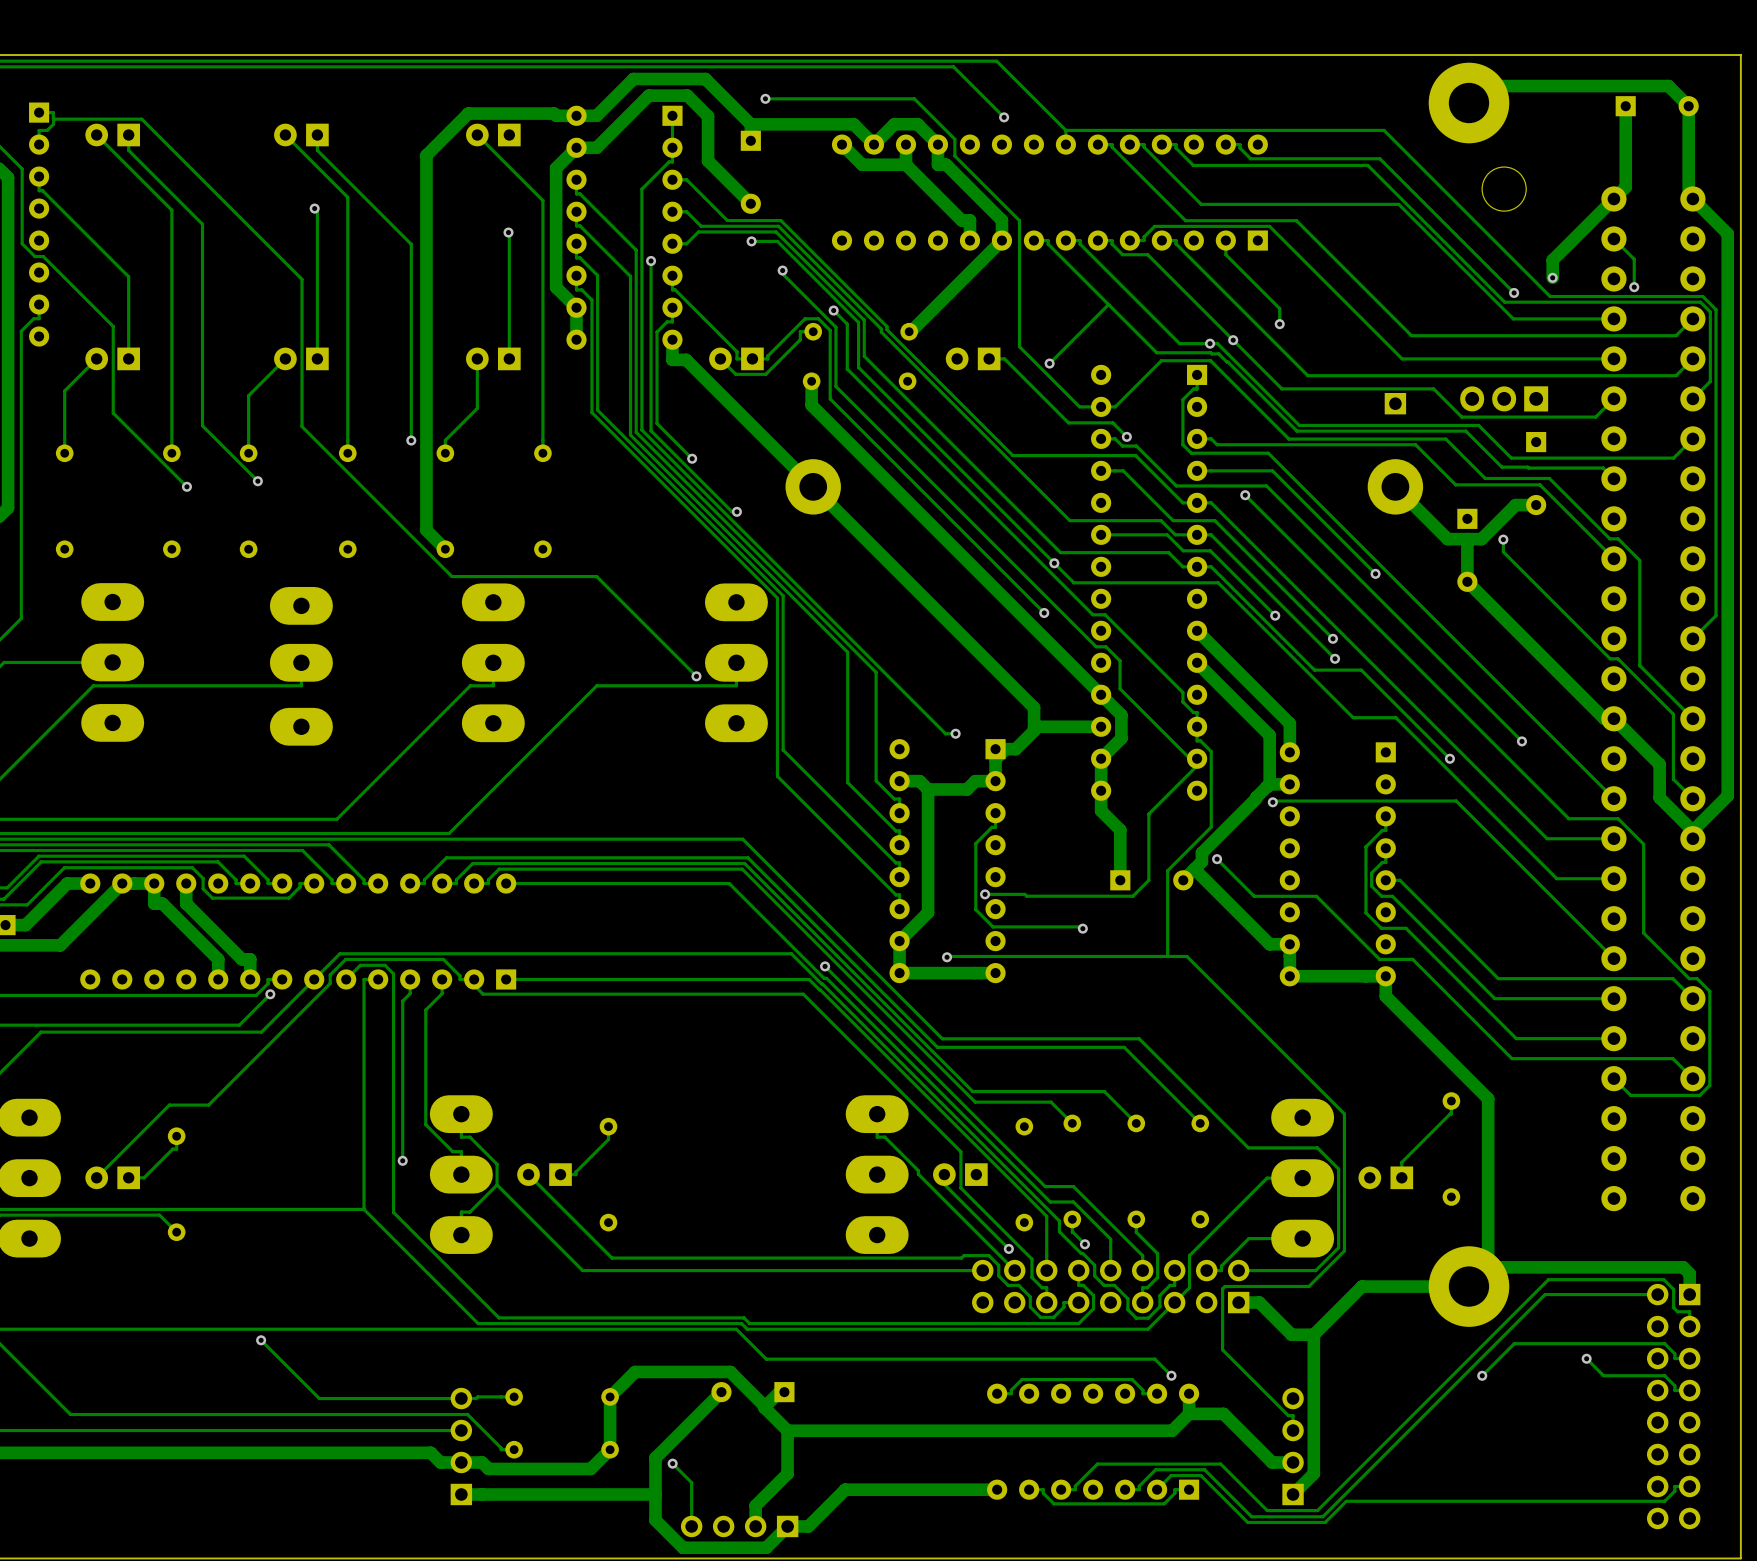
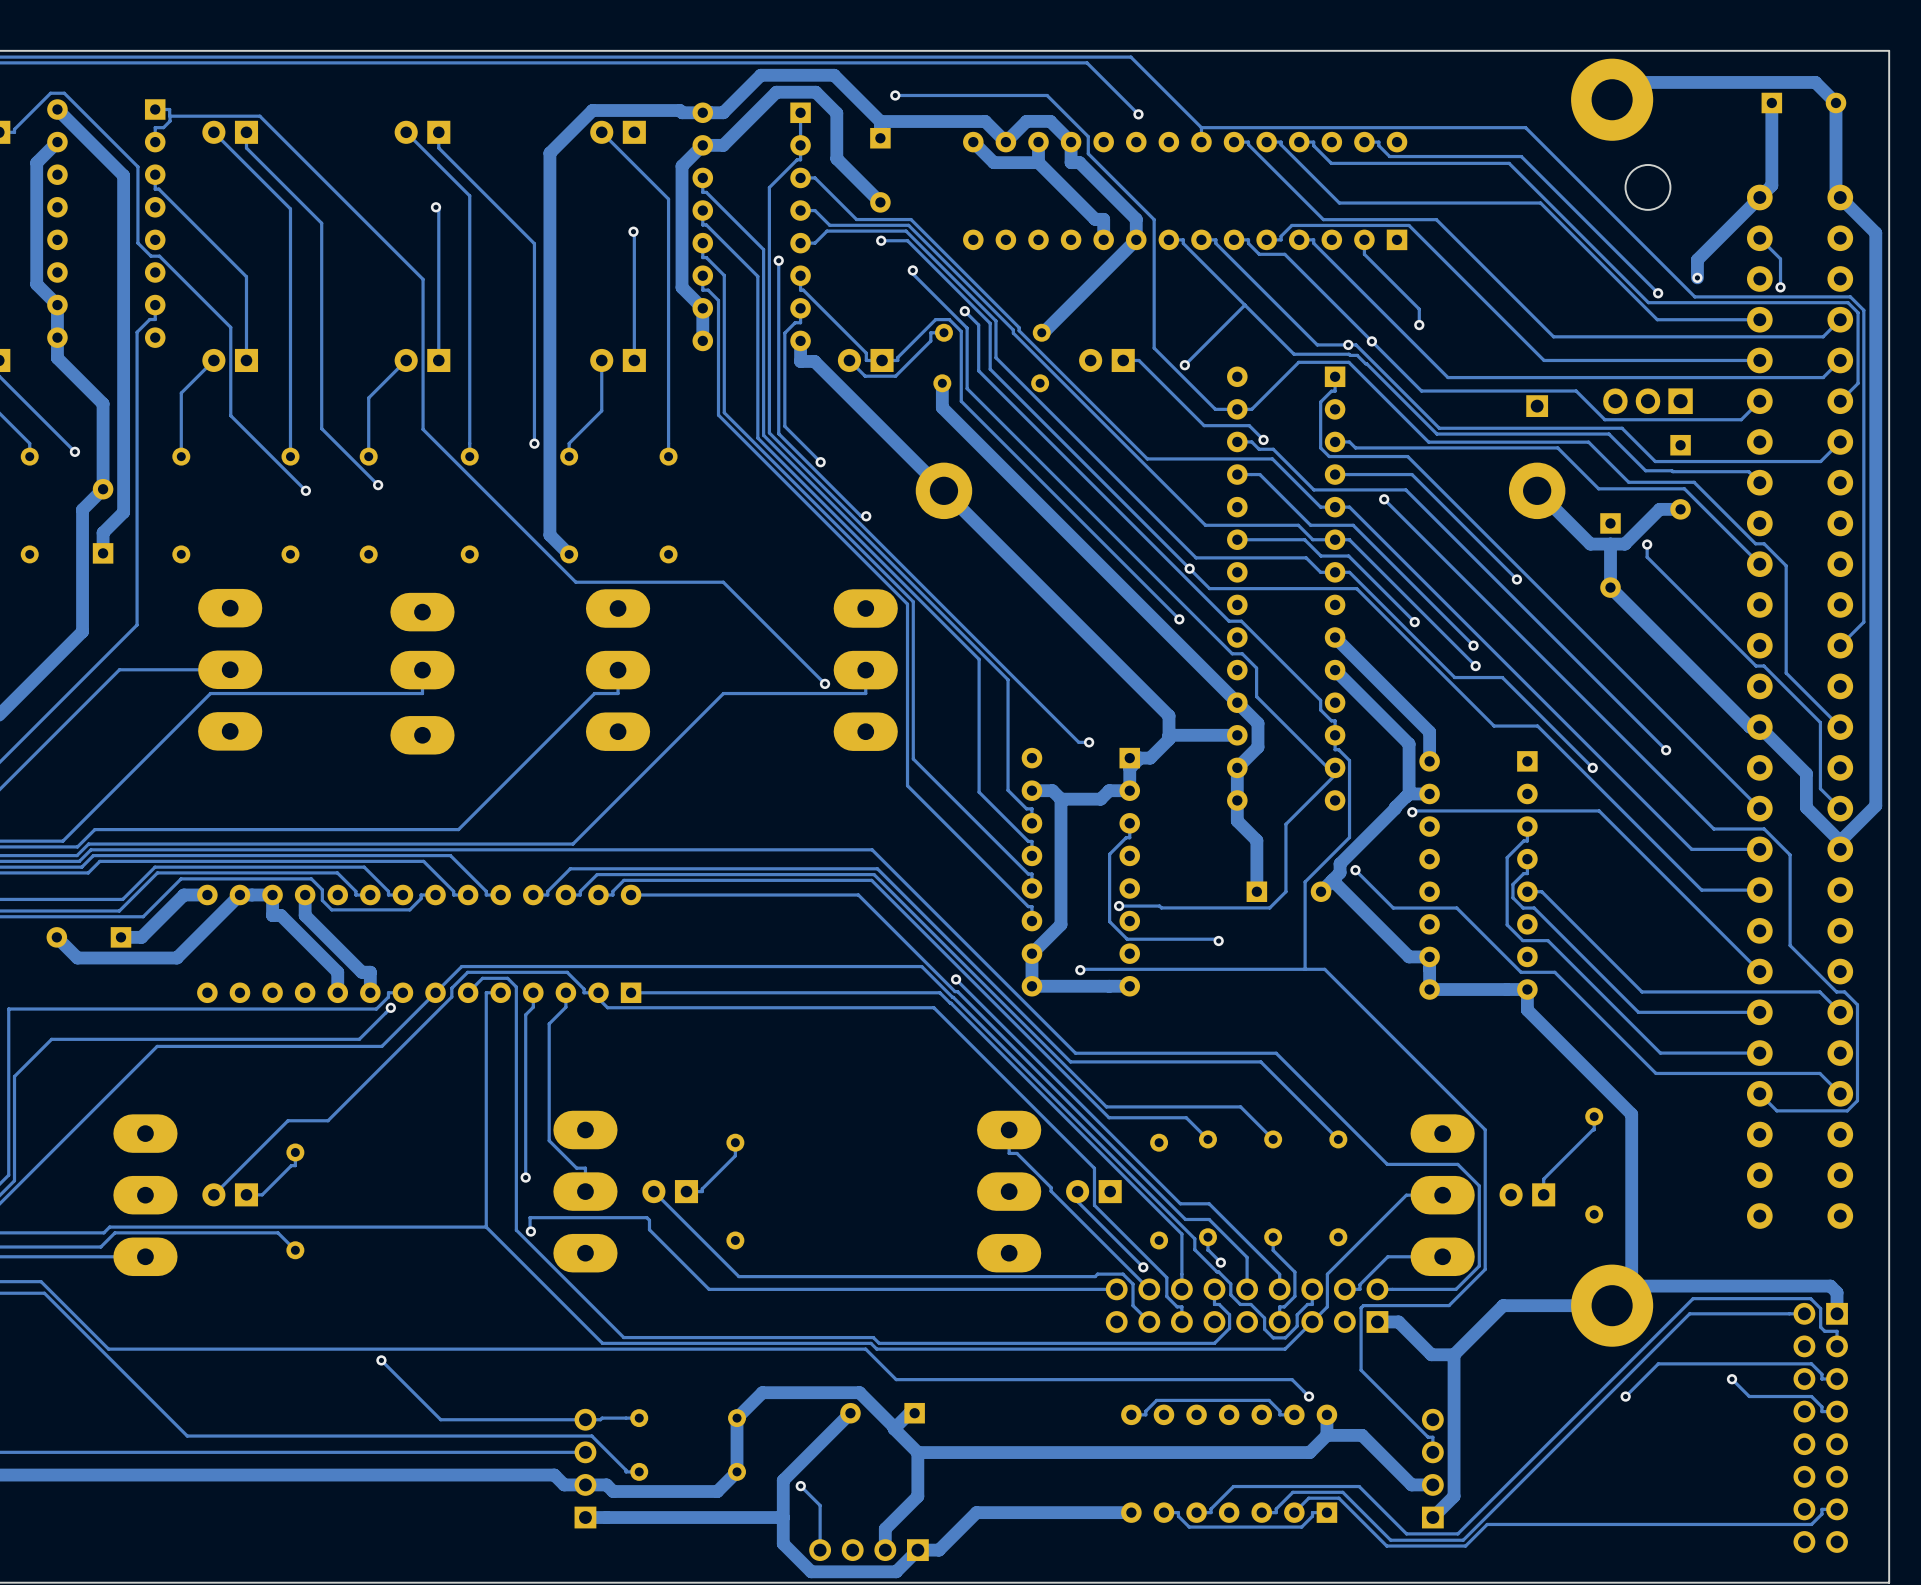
track: (461, 1114) (461, 1137) (469, 1137) (497, 1164) (497, 1184) -> none
track: (497, 1184) (524, 1212) -> (530, 1231) (530, 1217) (646, 1217) (649, 1220) (649, 1229)
track: (497, 1184) (469, 1212) (461, 1212) (461, 1235) -> none
via: none -> (530, 1231)
track: (998, 1275) (1008, 1285) (1018, 1285) (1030, 1296) (1030, 1307) (1040, 1317) (1053, 1317) (1063, 1307) (1063, 1302) (1078, 1302) -> (1133, 1294) (1133, 1305) (1149, 1321)

